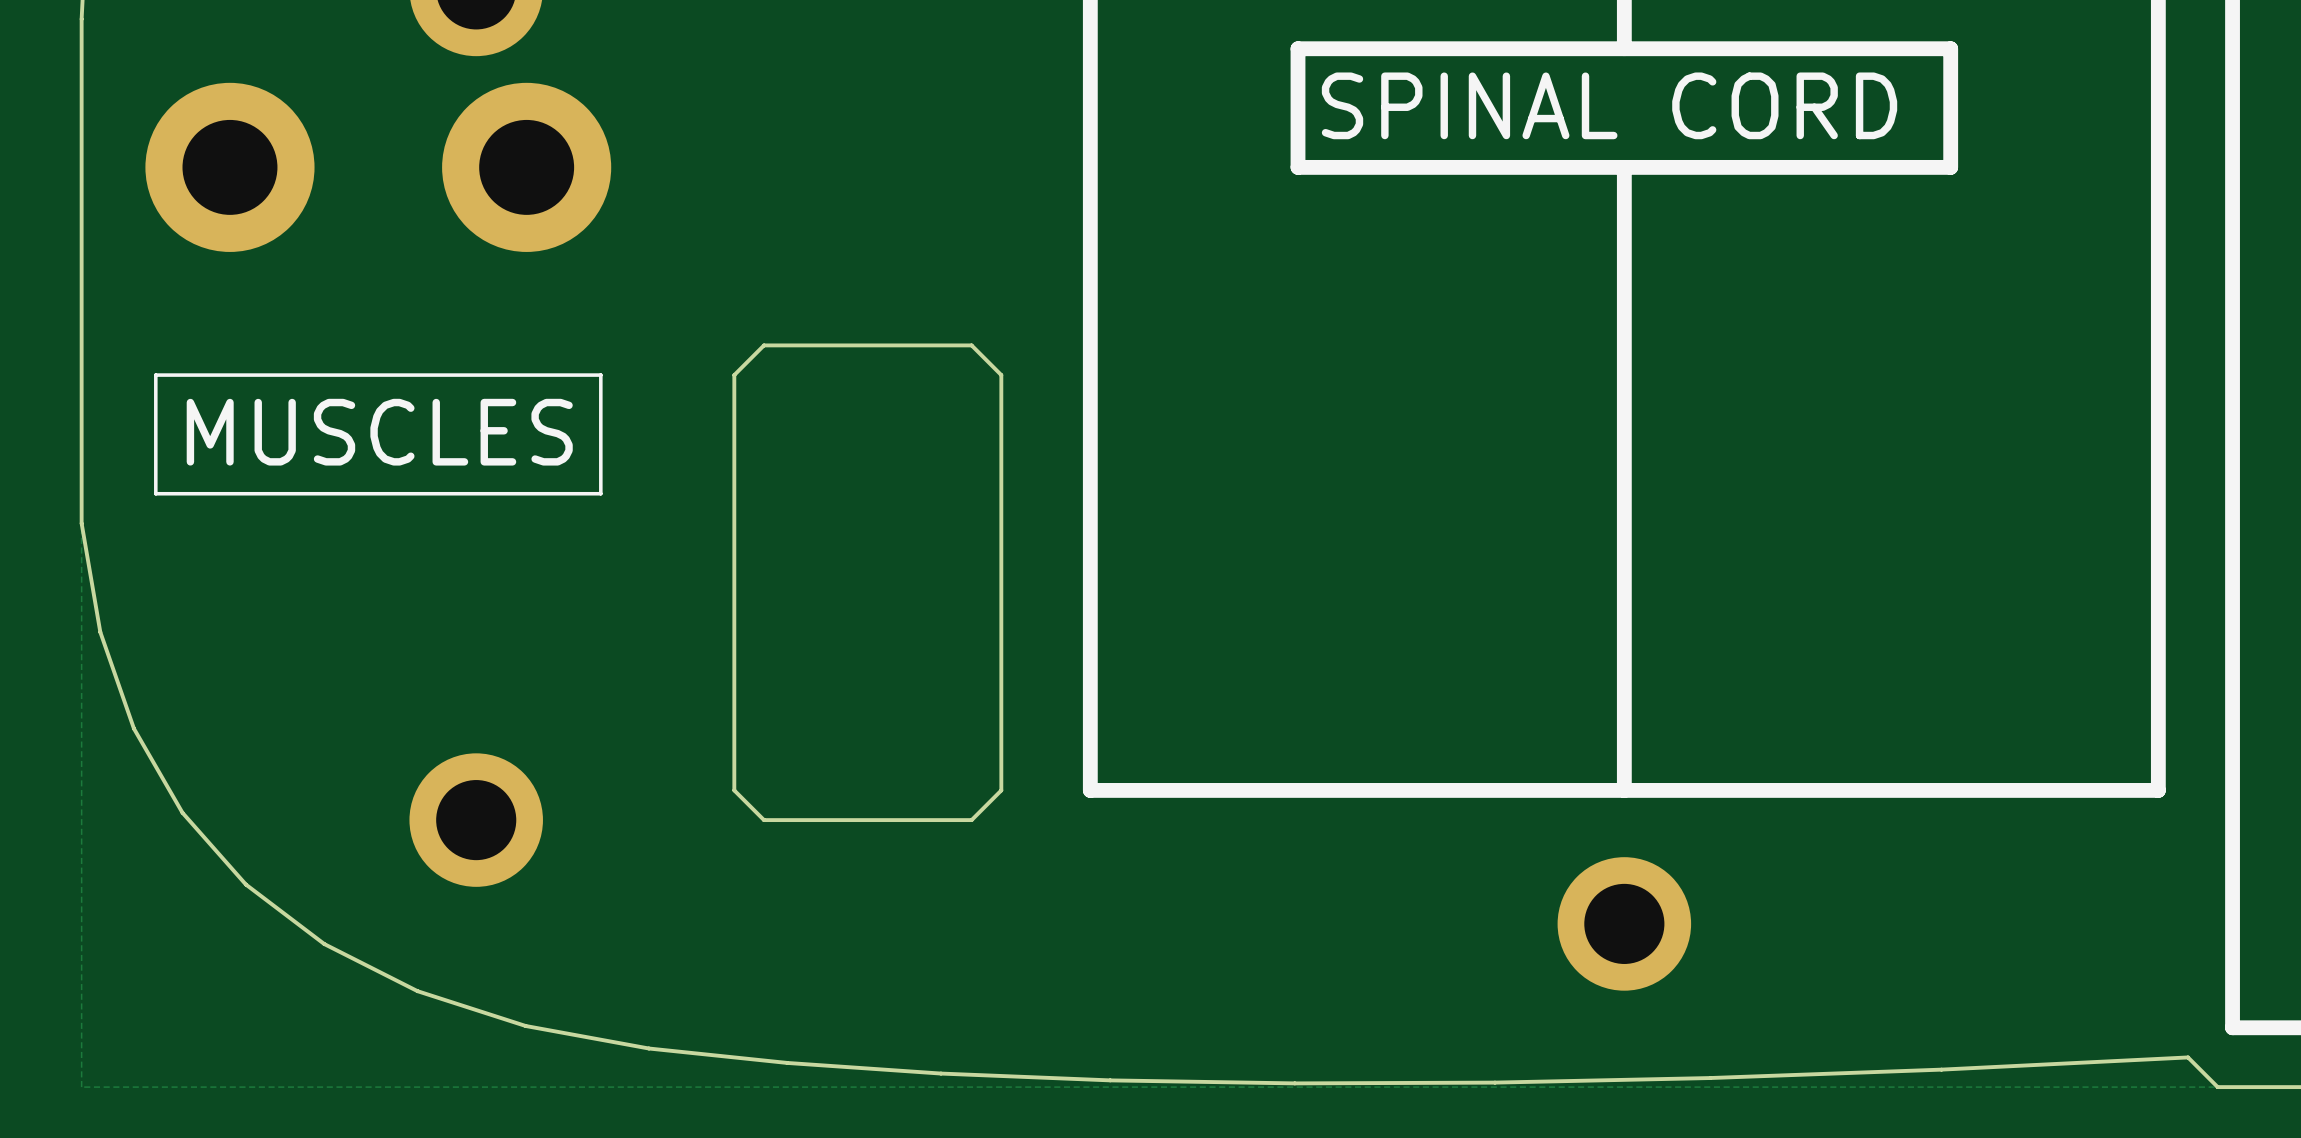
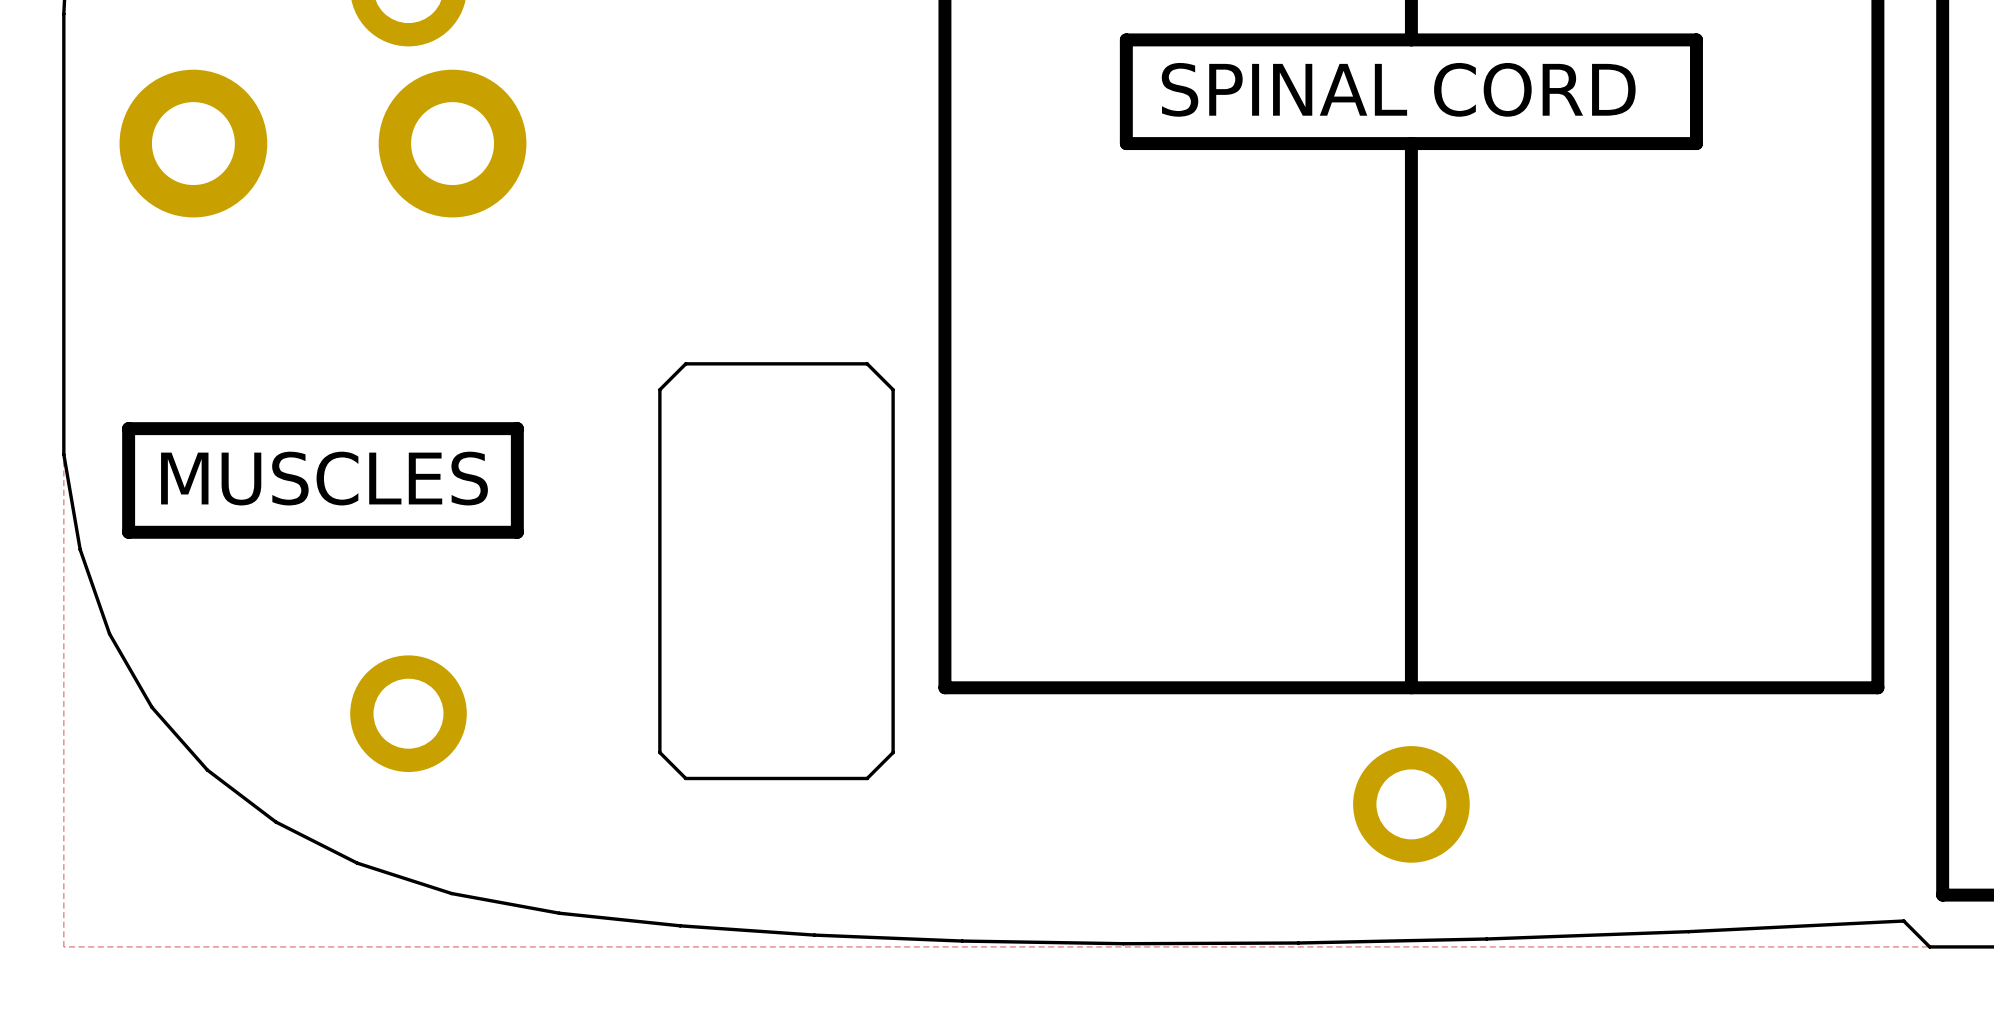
board edge: (763, 345) (971, 345) (1001, 375) (1001, 790) (971, 820) (763, 820) (734, 790) (734, 375) (763, 345) -> (685, 363) (659, 389) (659, 752) (685, 778) (867, 778) (893, 752) (893, 389) (867, 363) (685, 363)
text position: MUSCLES (379, 432) -> MUSCLES (324, 478)
line: (155, 493) (155, 375) (600, 375) (600, 493) -> (128, 428) (128, 532) (517, 532) (517, 428)
line width: thin (155, 493) (600, 493) -> thick (128, 428) (517, 428)

